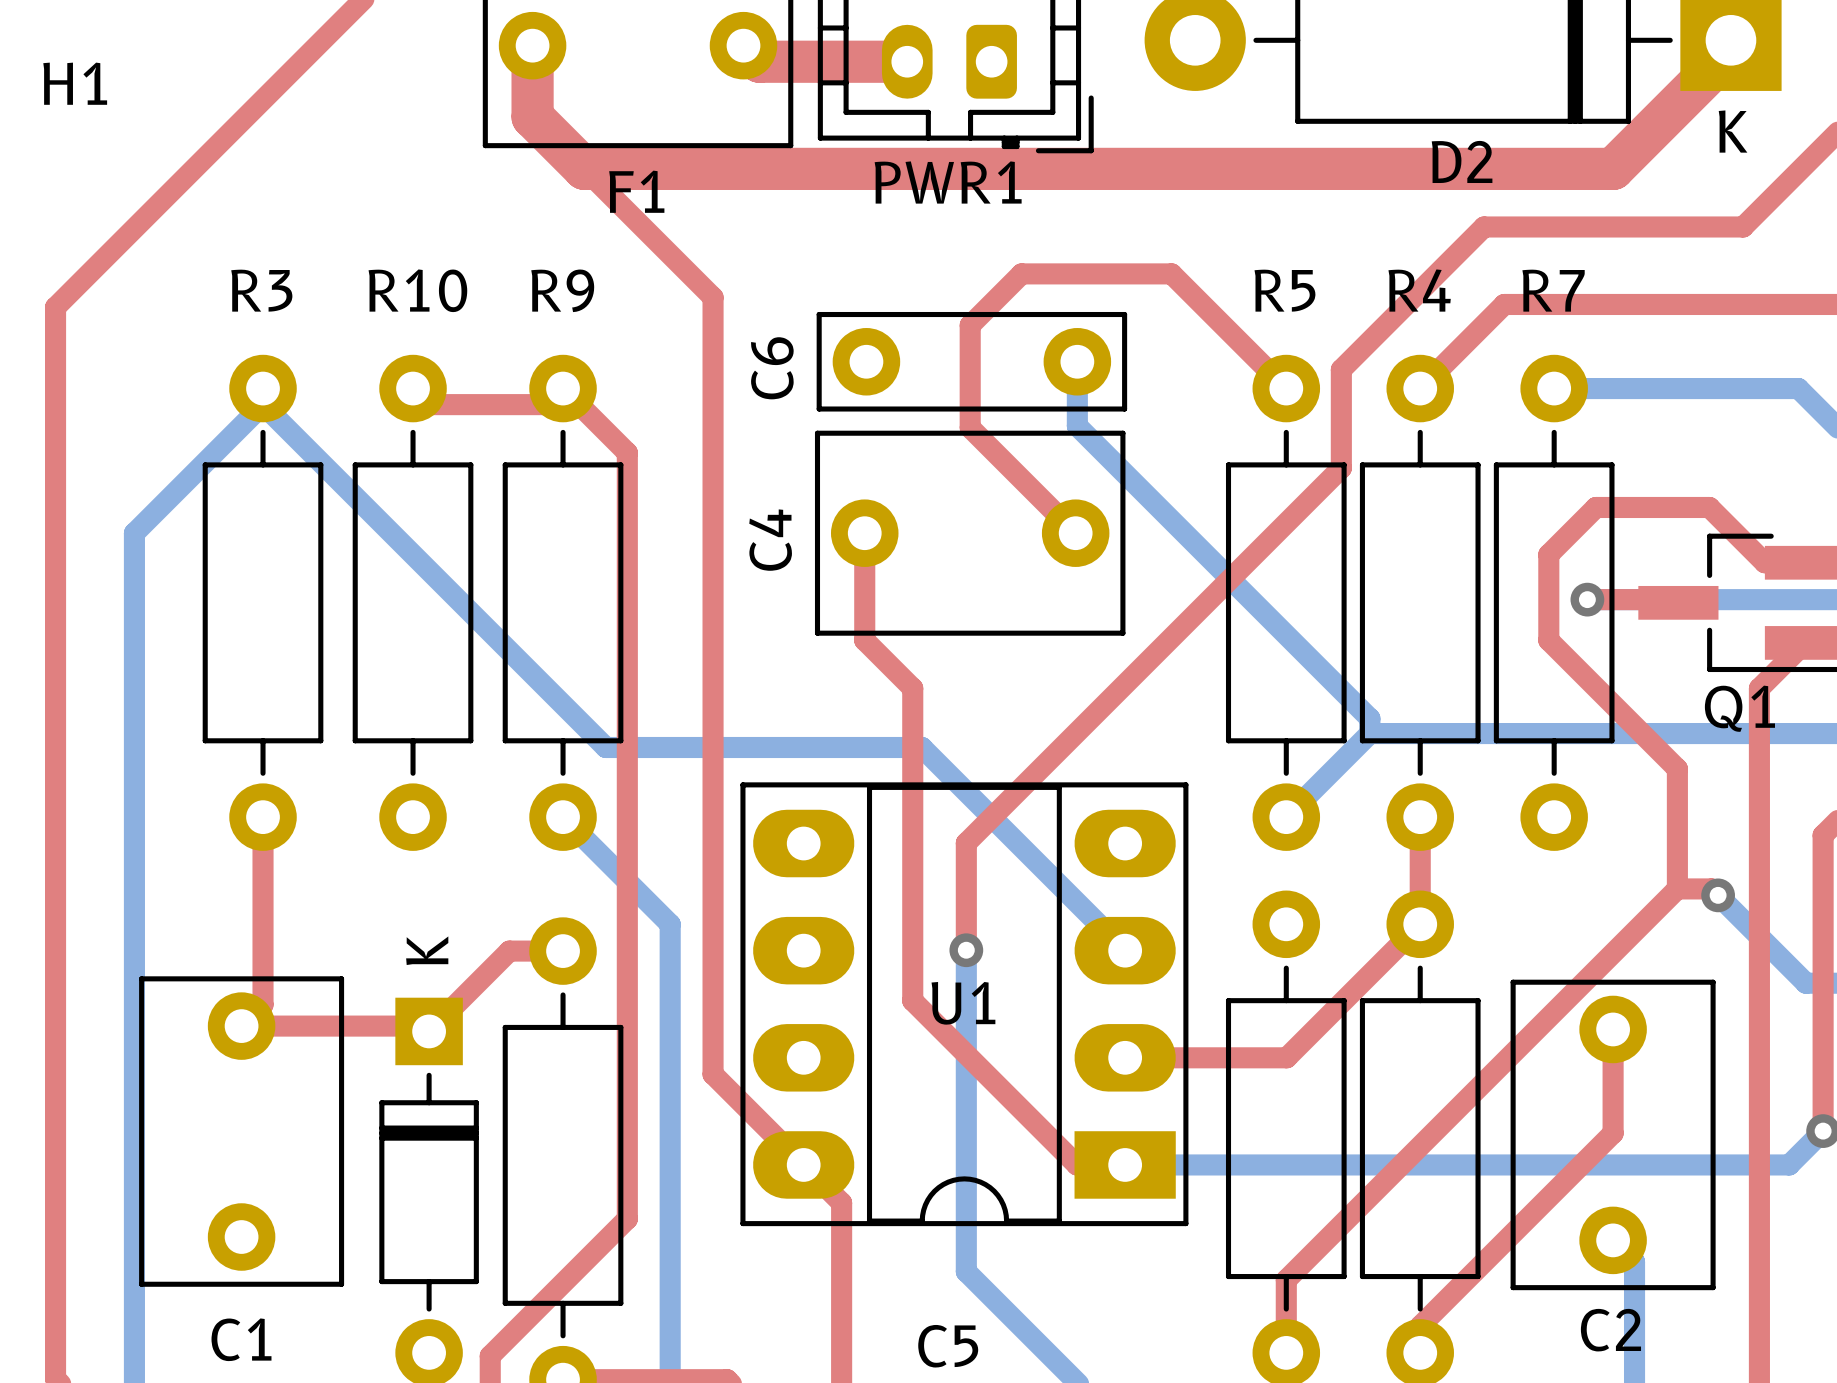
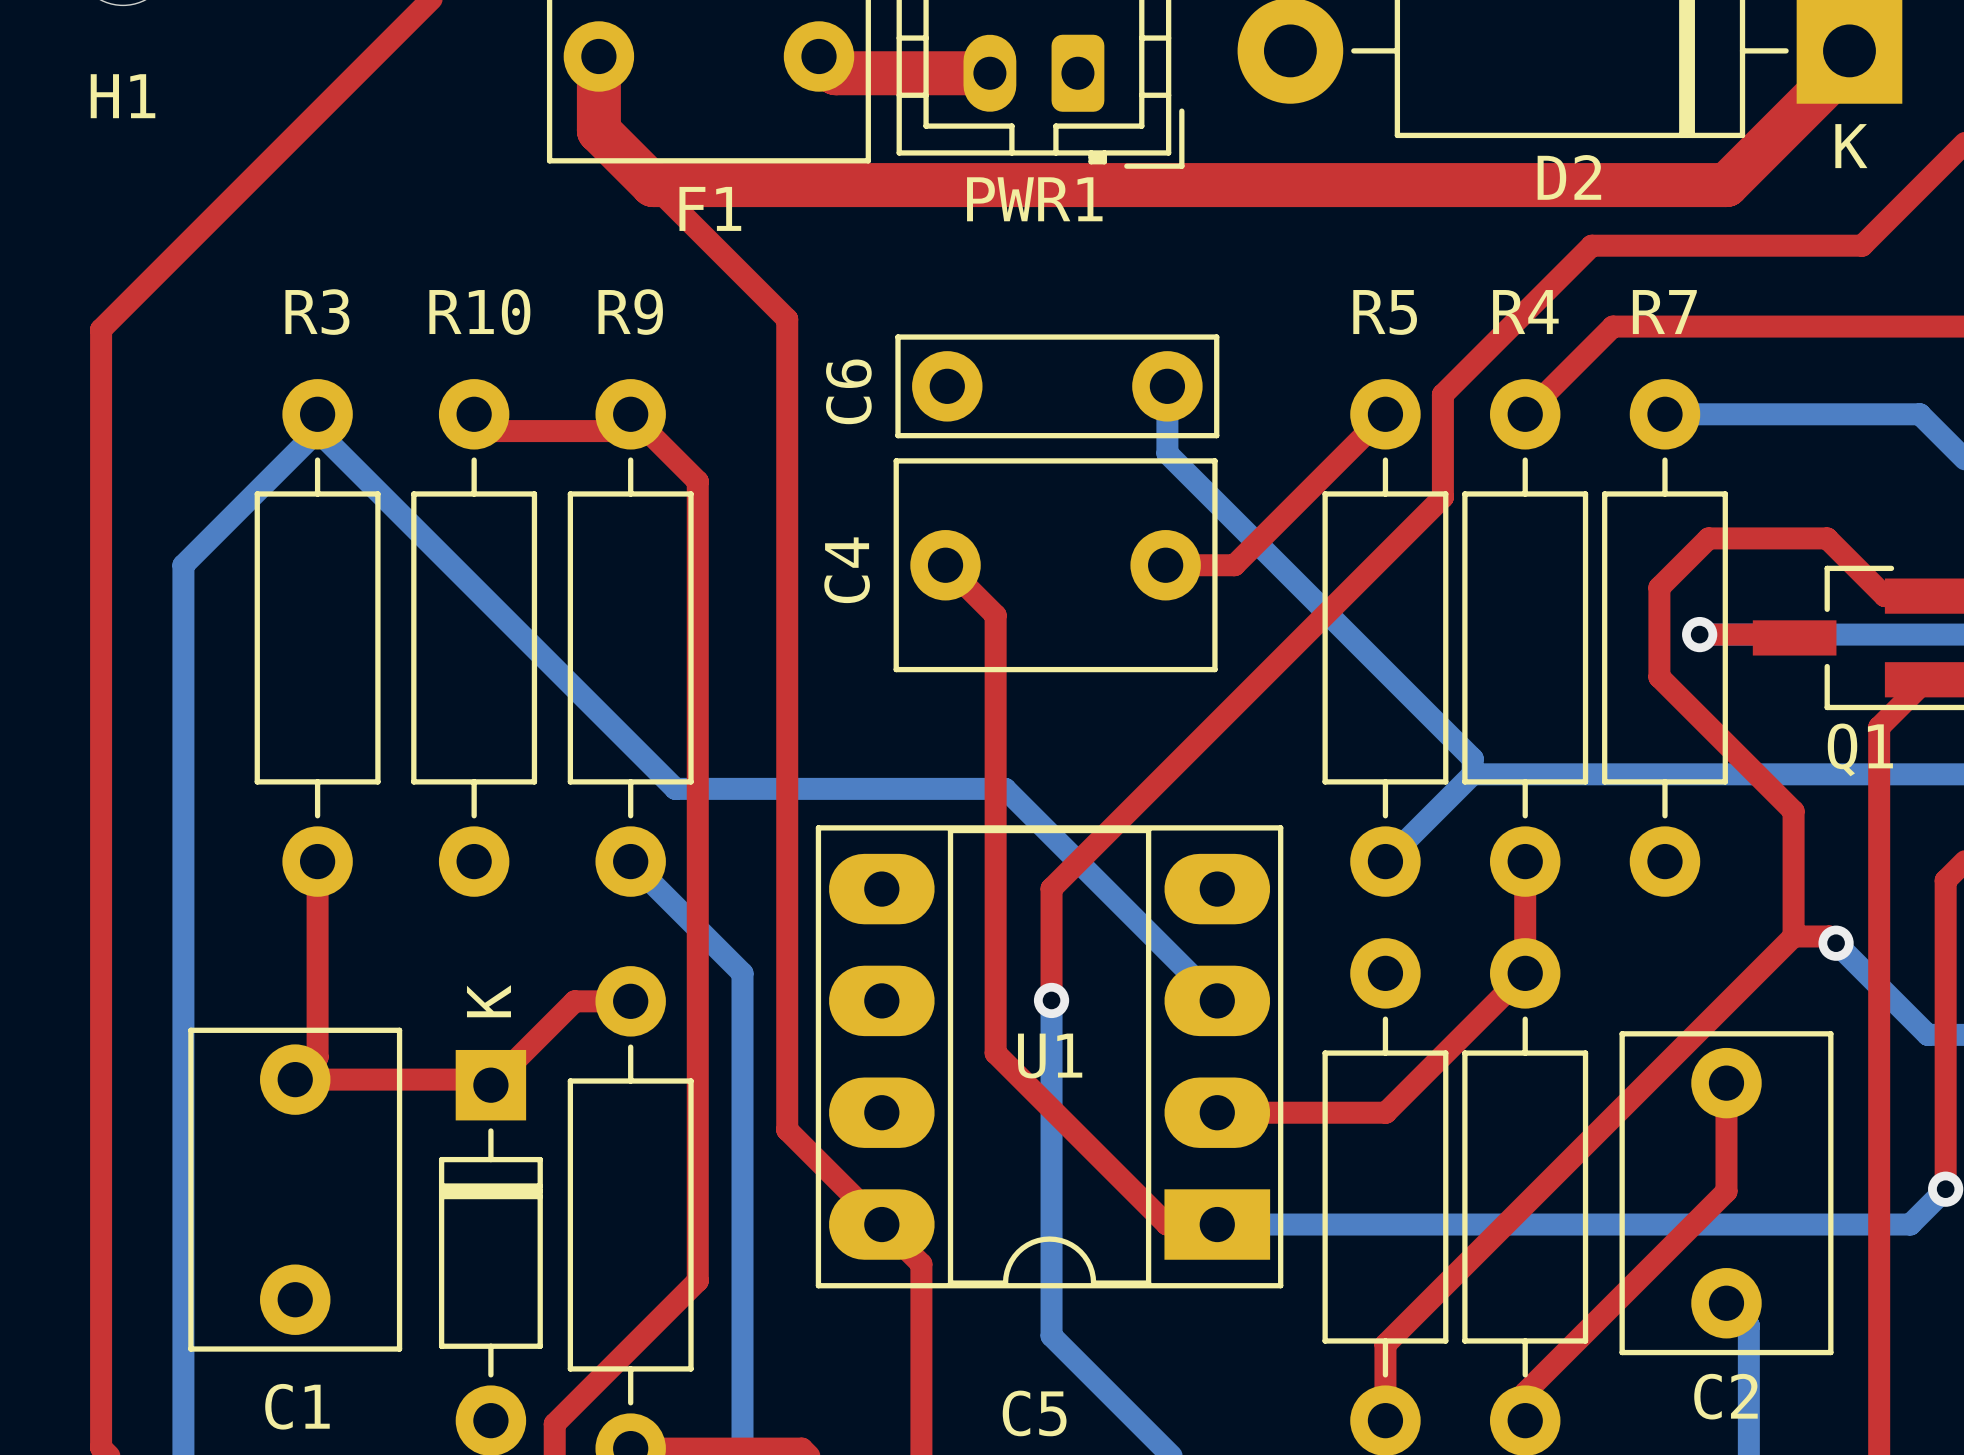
top track: (1286, 388) (1171, 273) (1021, 273) (970, 325) (970, 427) (1075, 533) -> (1385, 414) (1234, 565) (1165, 565)
top track: (864, 533) (864, 640) (912, 688) -> (945, 565) (995, 615) (995, 727)

